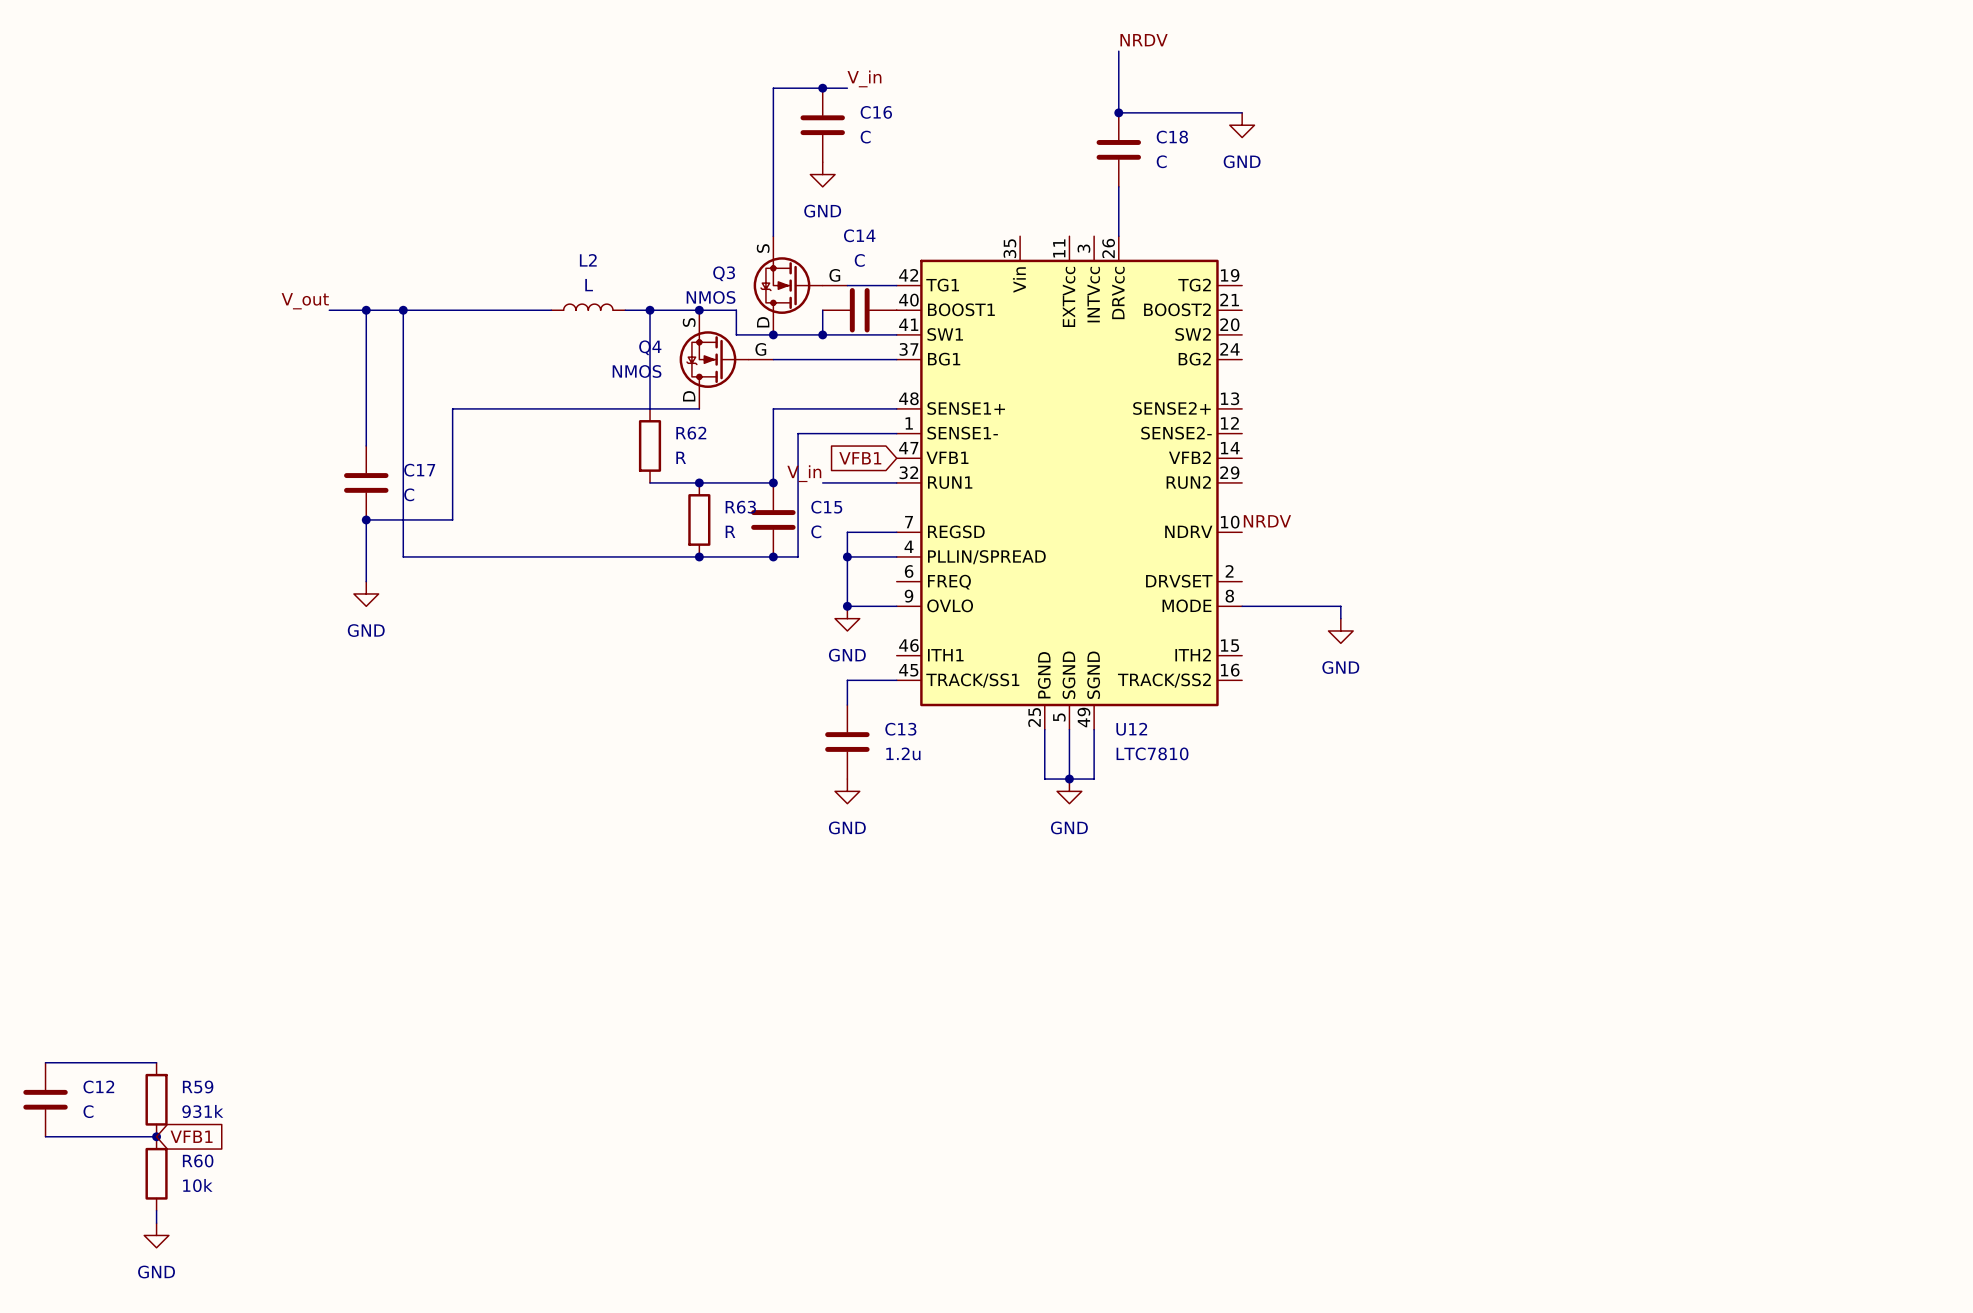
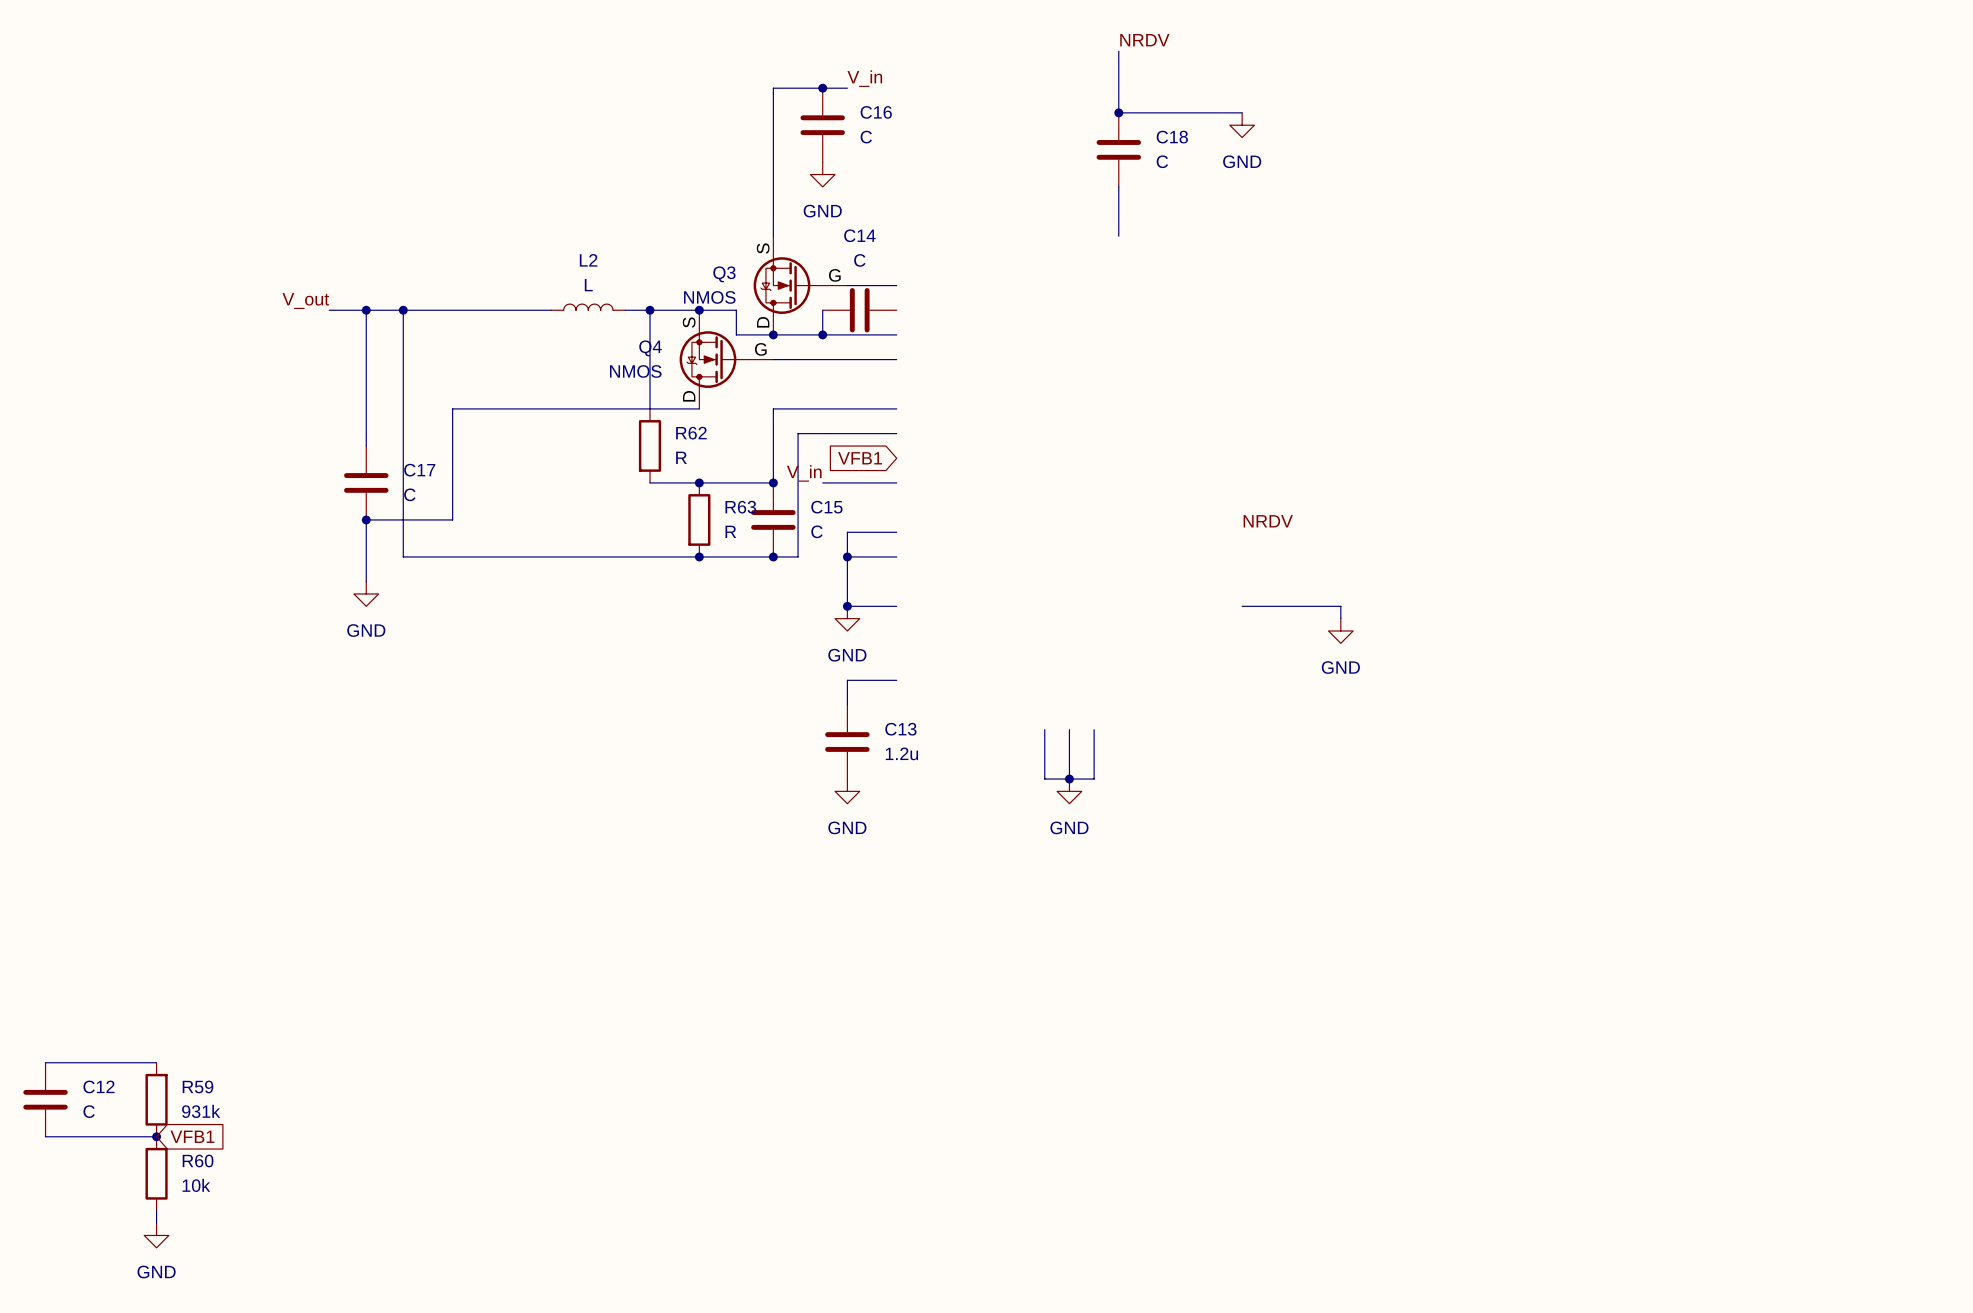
U12: LTC7810 (1069, 482) -> none

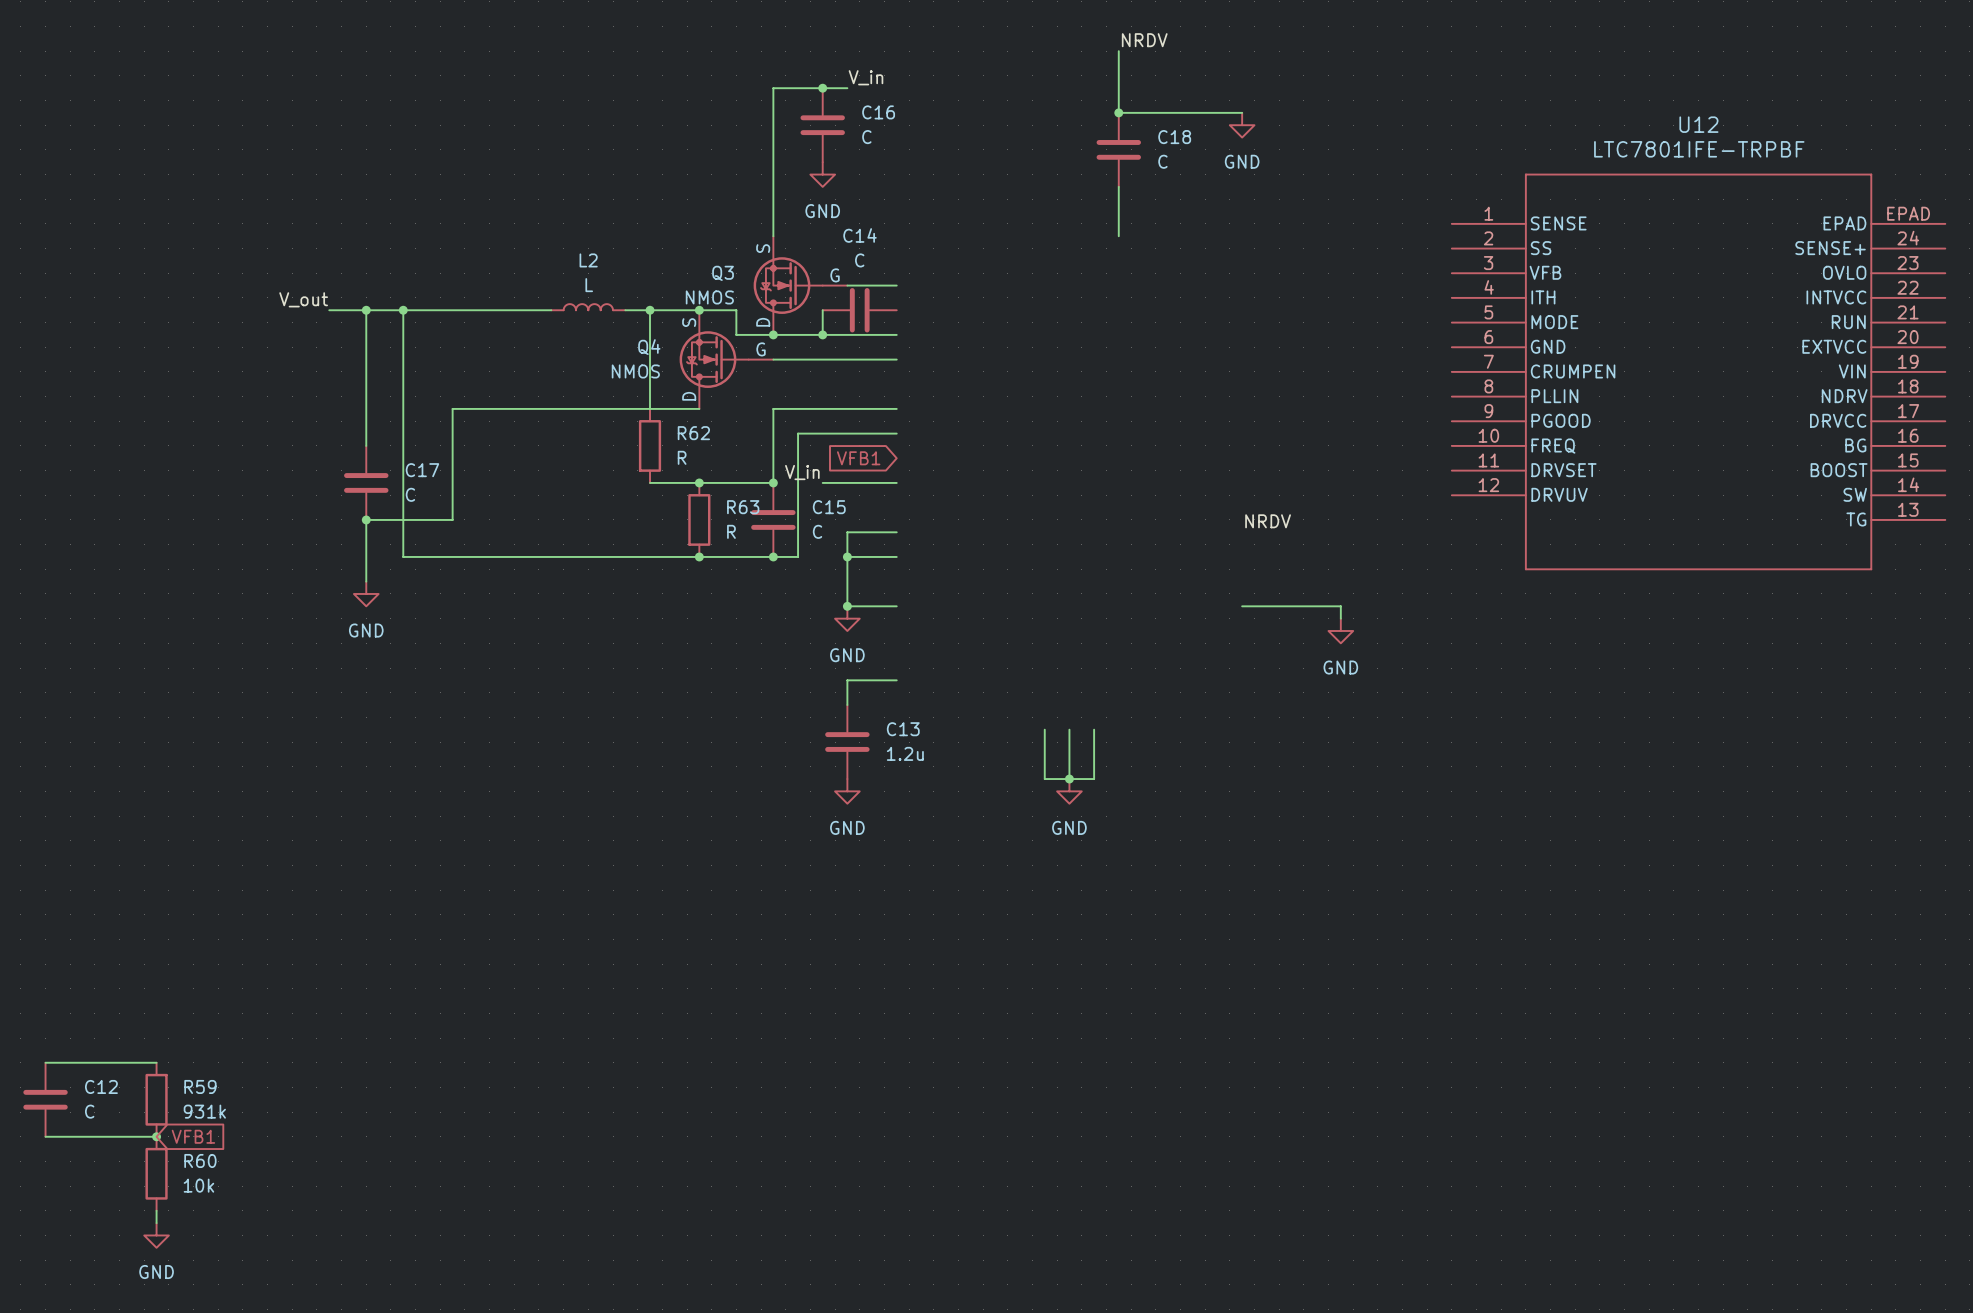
U12: none -> LTC7801IFE-TRPBF (1698, 371)

